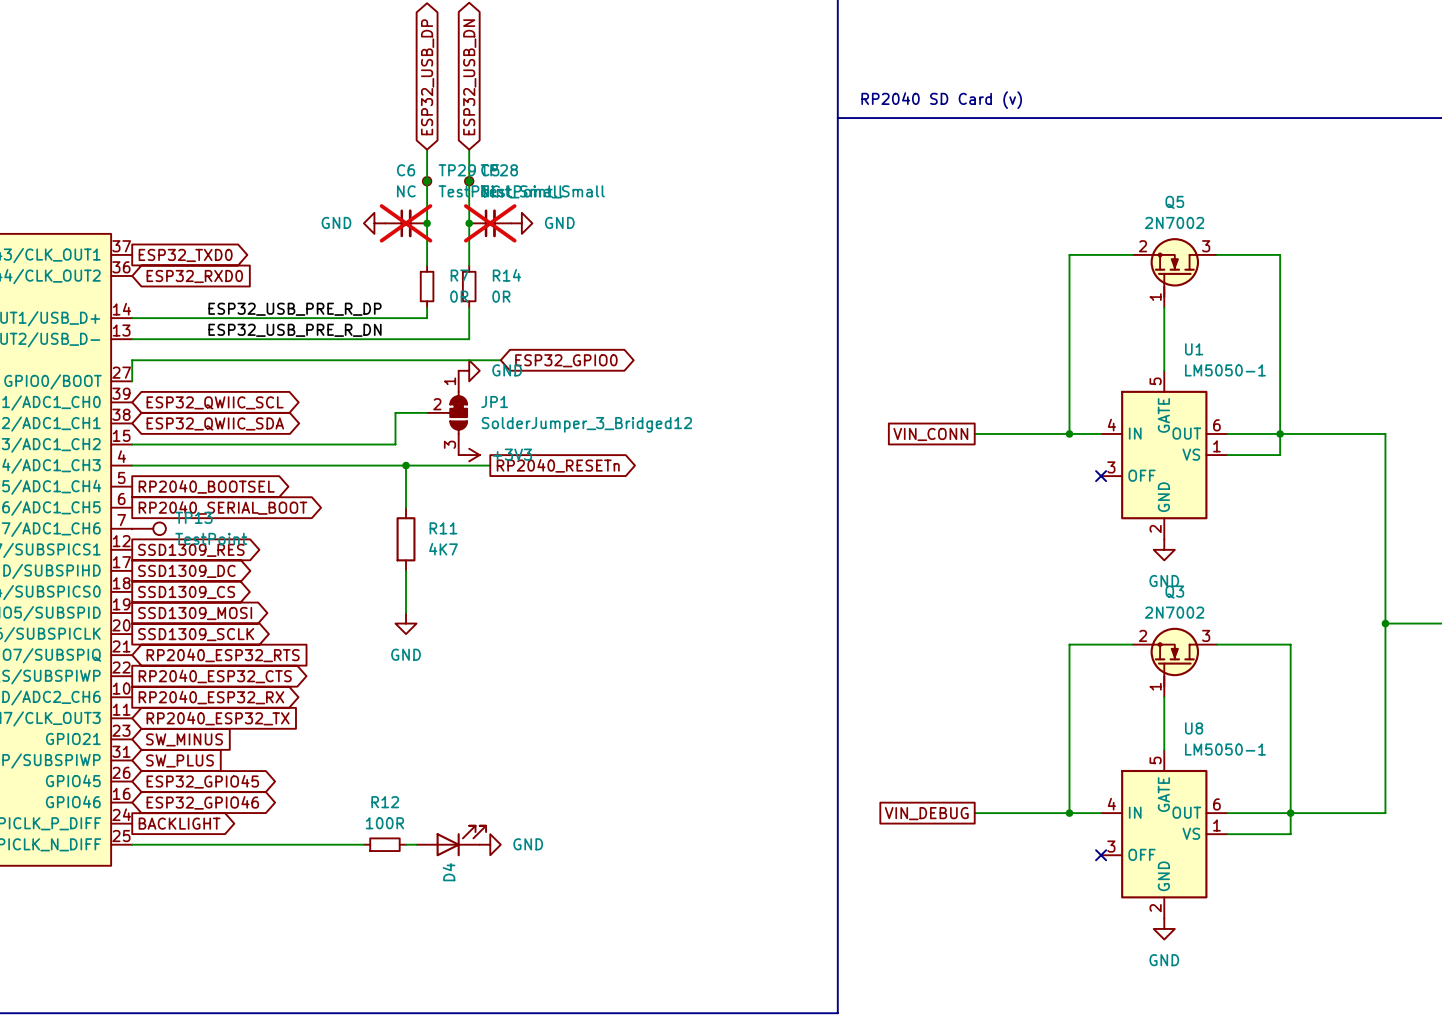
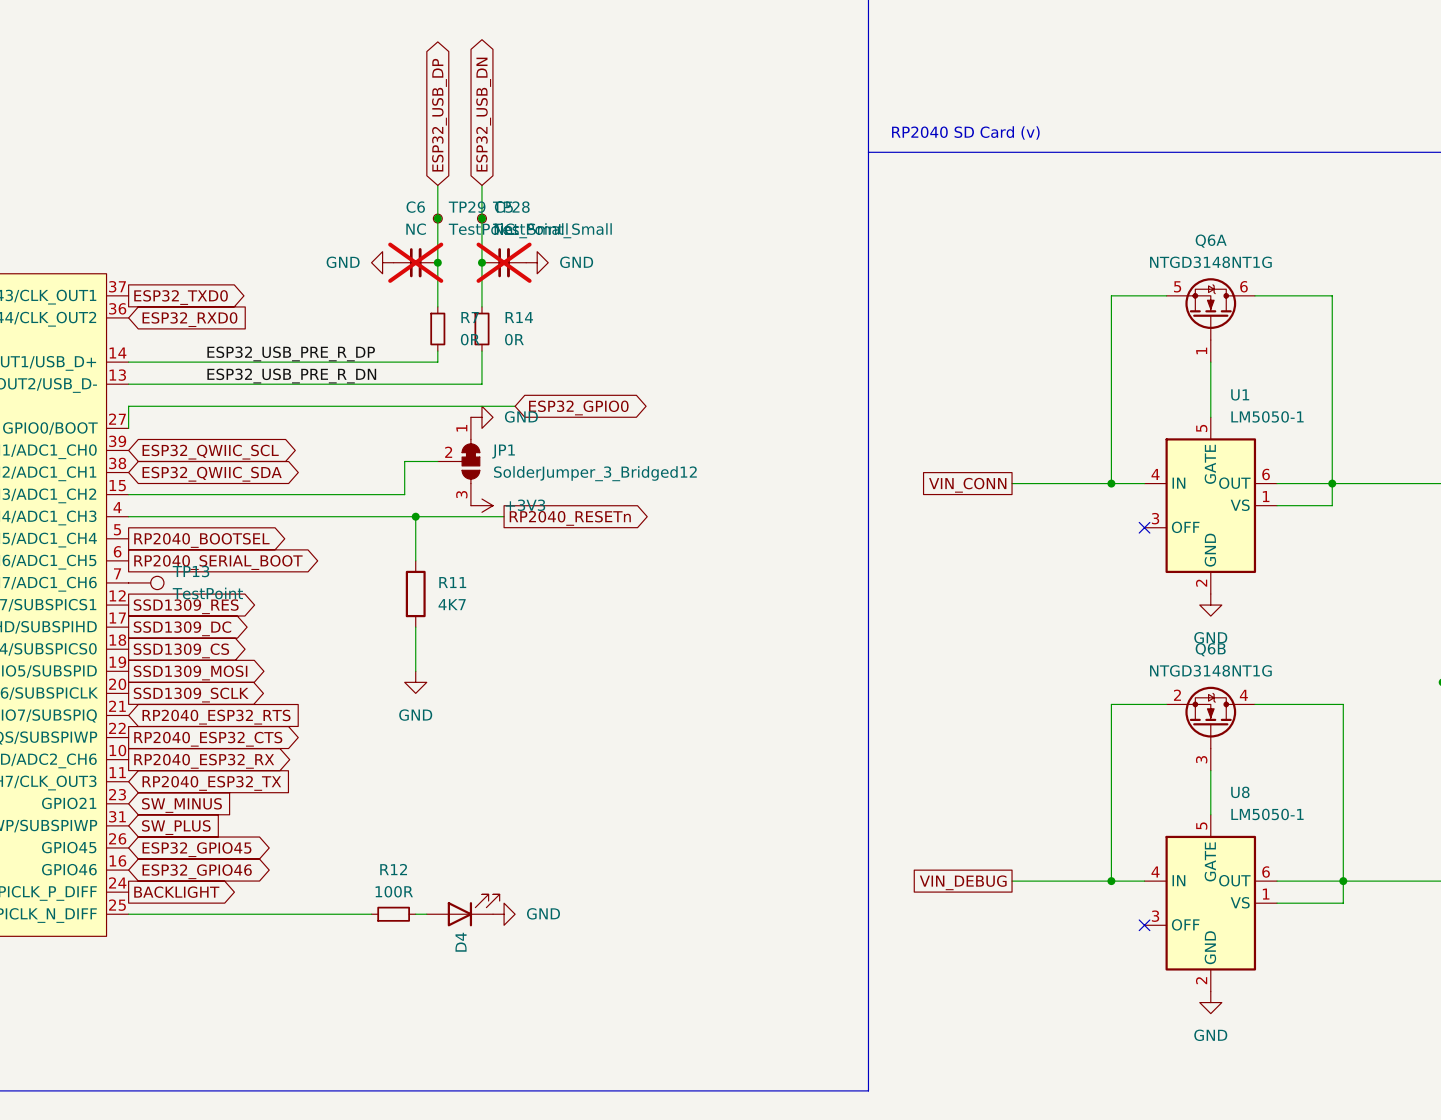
Q5: 2N7002 (1174, 272) -> none
Q6A: none -> NTGD3148NT1G (1210, 320)
Q3: 2N7002 (1174, 662) -> none
Q6B: none -> NTGD3148NT1G (1210, 728)

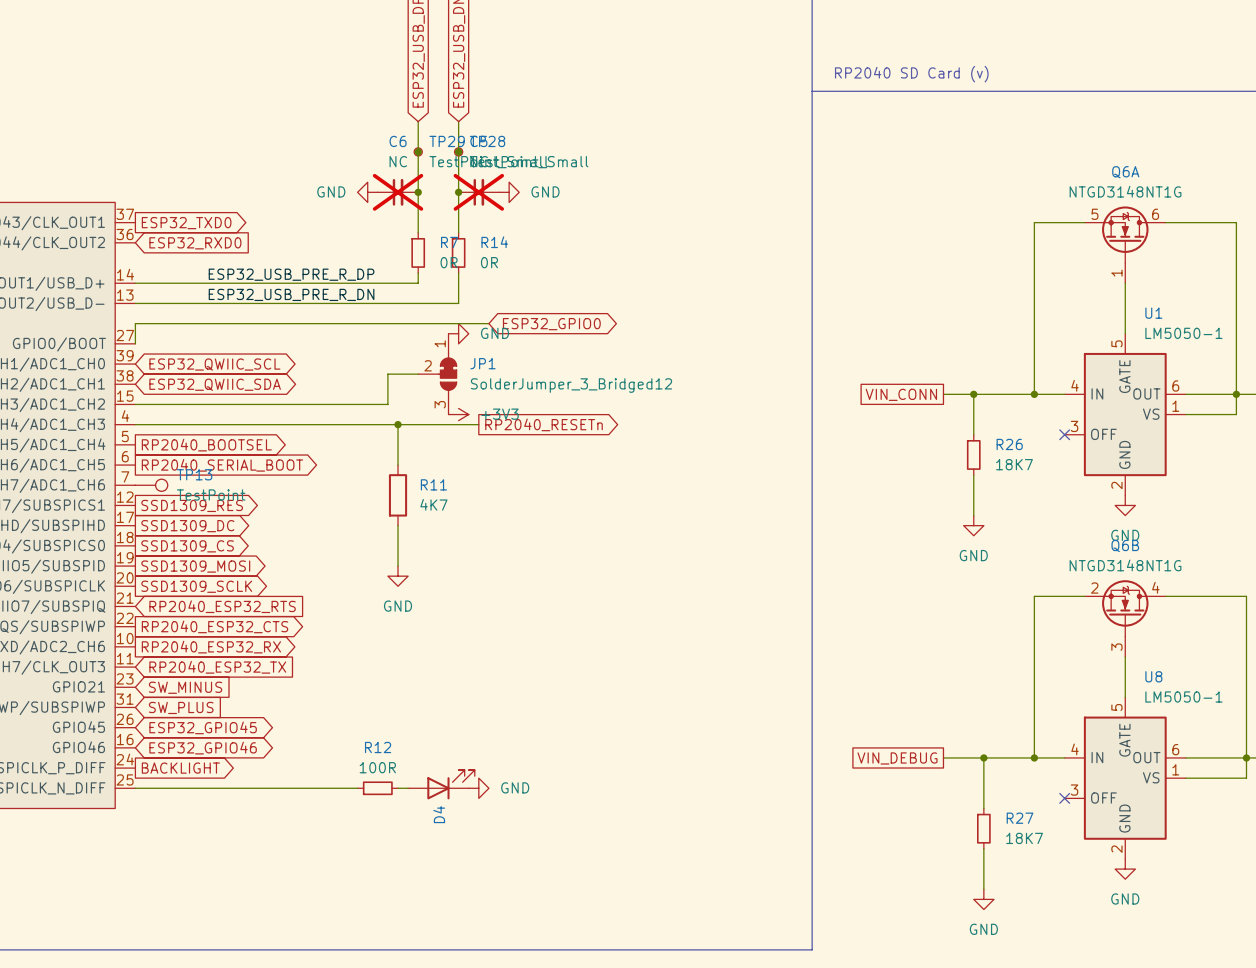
wire: none -> (973, 394) (973, 434)
junction: none -> (973, 394)
R26: none -> 18K7 (973, 454)
wire: none -> (973, 475) (973, 515)
power symbol: none -> GND (973, 525)
wire: none -> (983, 757) (983, 808)
junction: none -> (983, 757)
R27: none -> 18K7 (983, 828)
wire: none -> (983, 848) (983, 889)
power symbol: none -> GND (983, 899)

